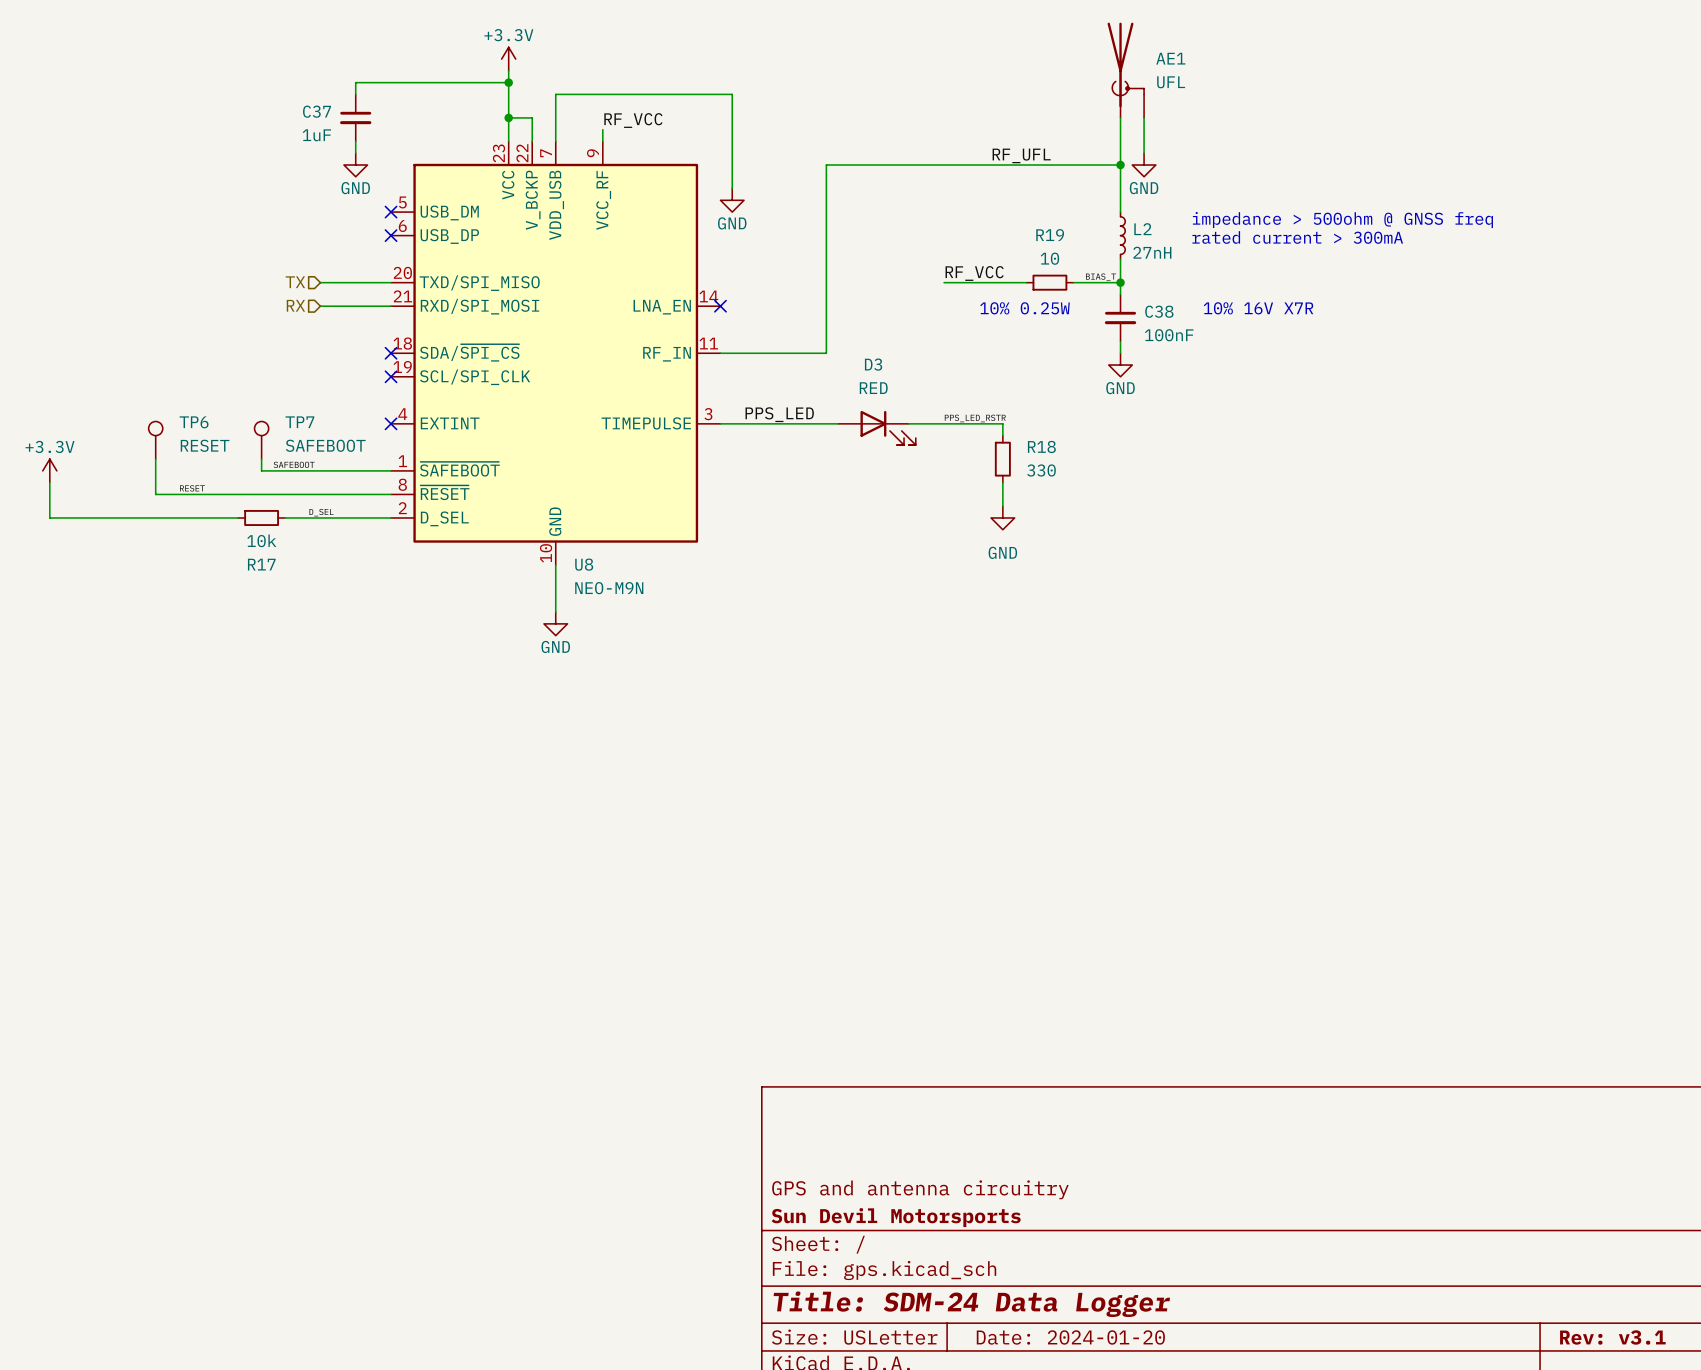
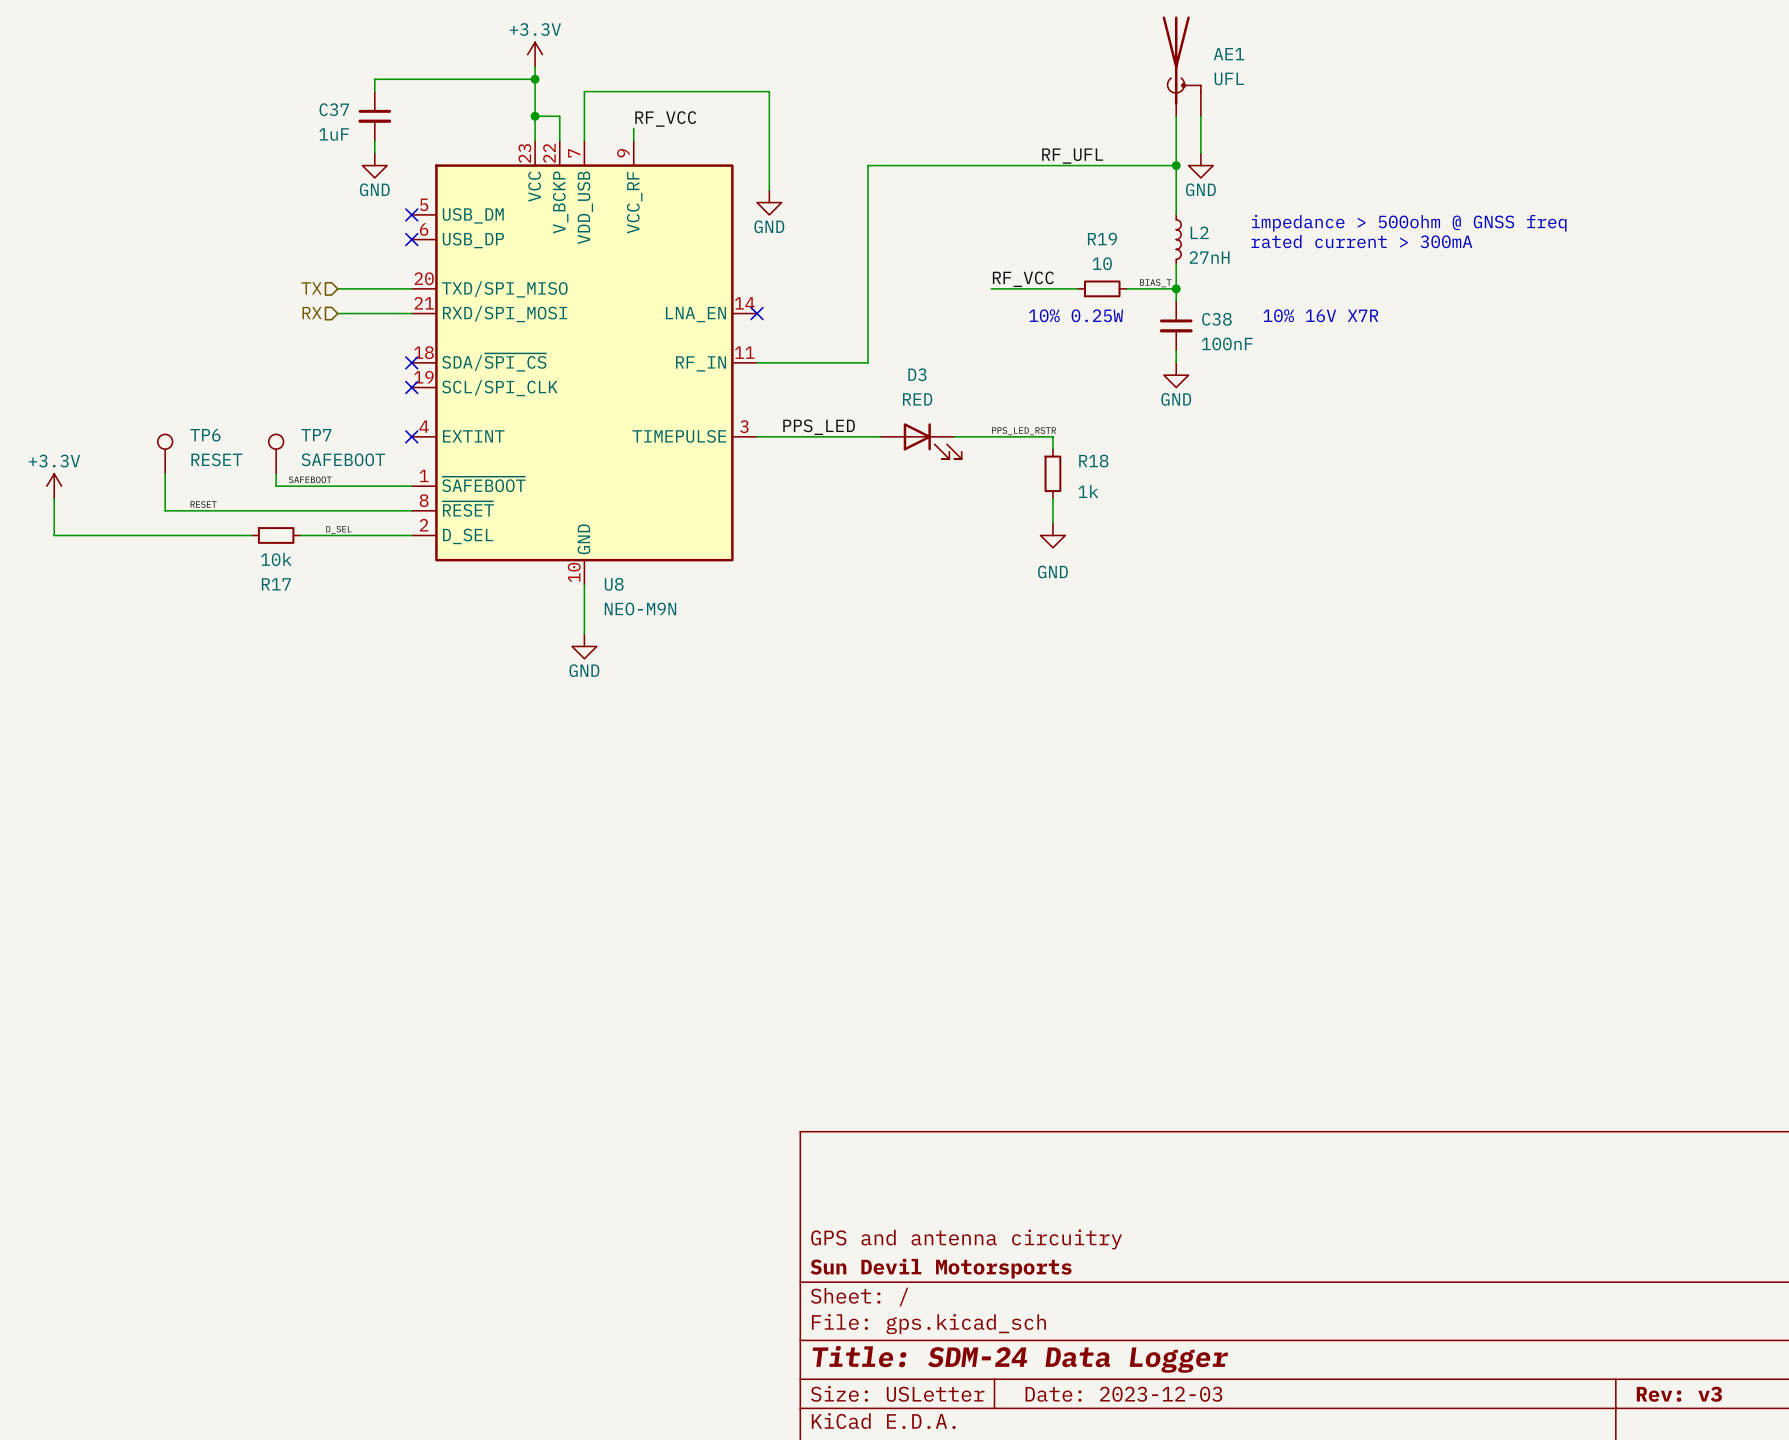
R18 value: 330 (1041, 470) -> 1k (1088, 491)
title block: Date: 2024-01-20 (1070, 1337) -> Date: 2023-12-03 (1123, 1394)
title block: Rev: v3.1 (1612, 1337) -> Rev: v3 (1679, 1394)

